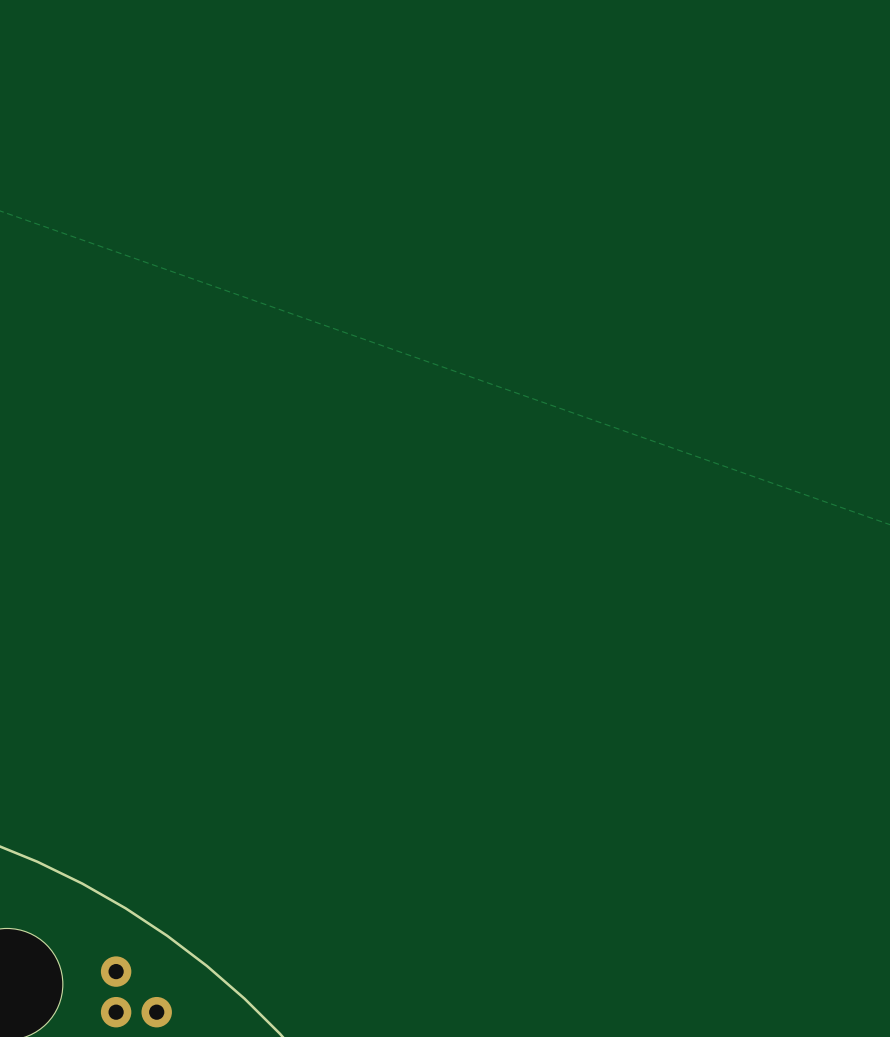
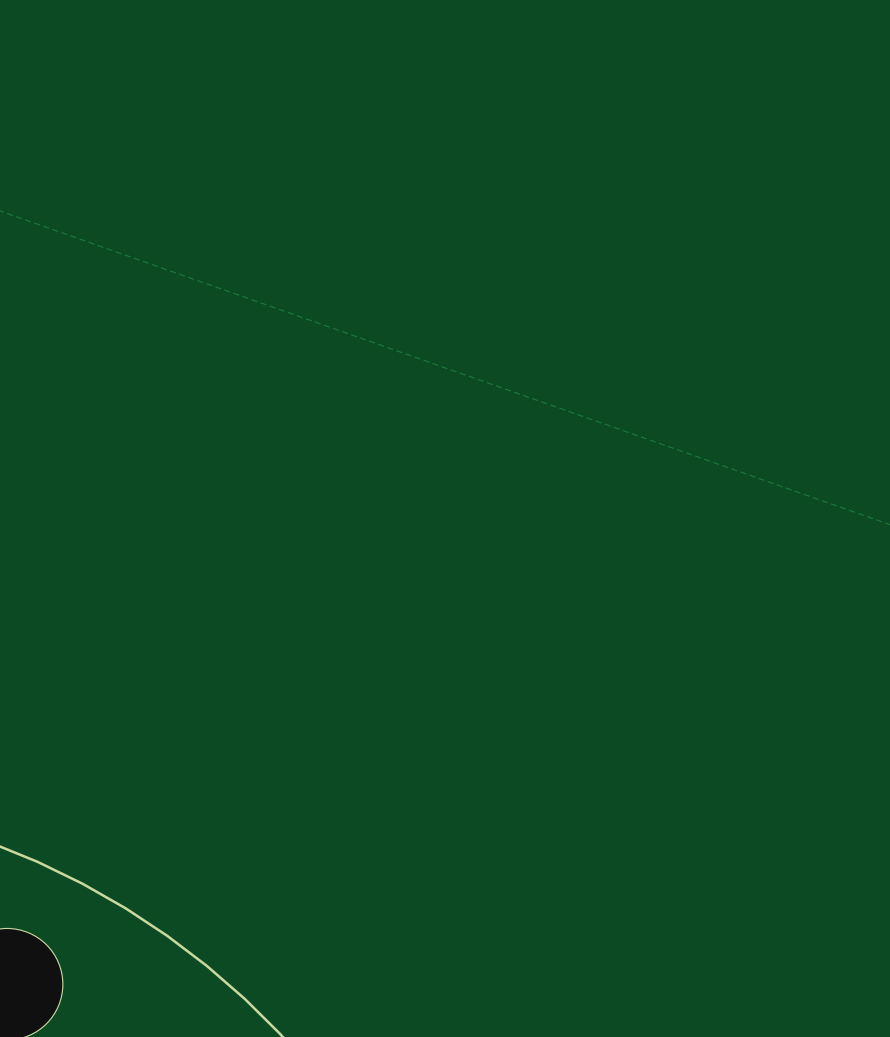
via: (116, 971) -> none
via: (116, 1012) -> none
via: (156, 1012) -> none

